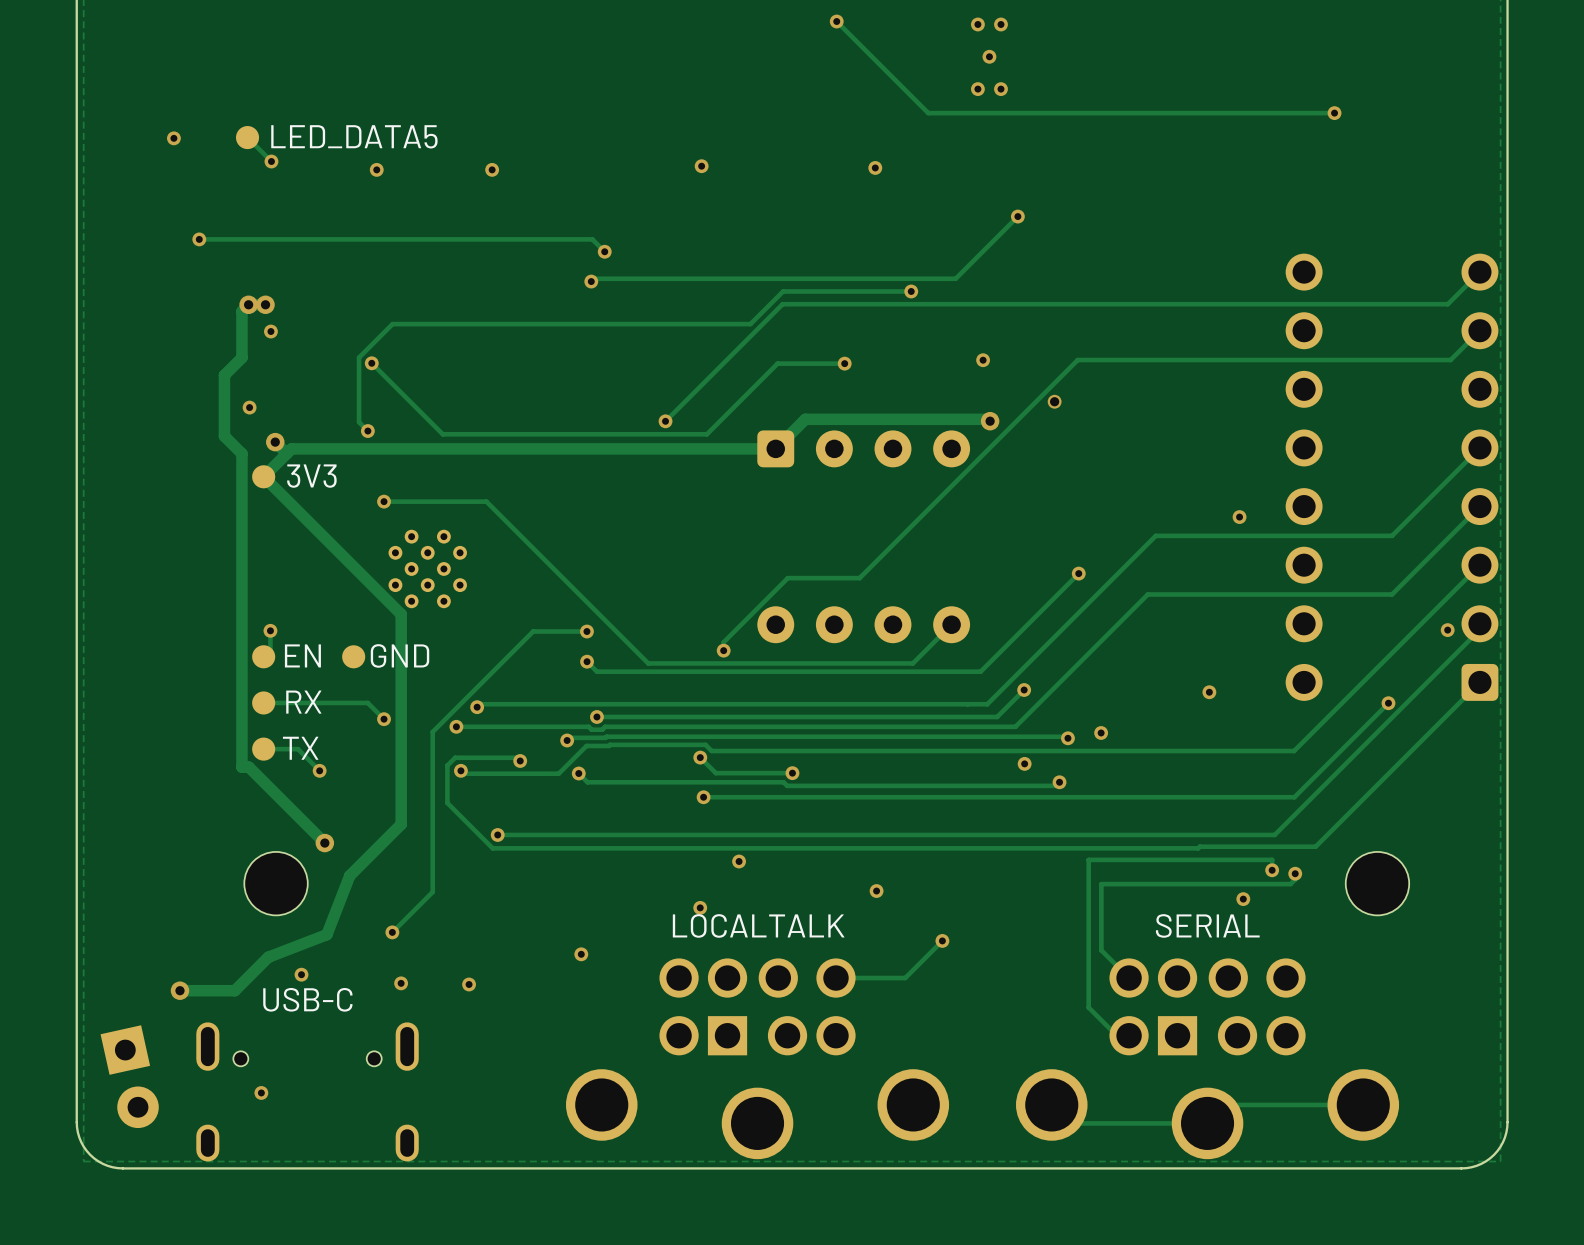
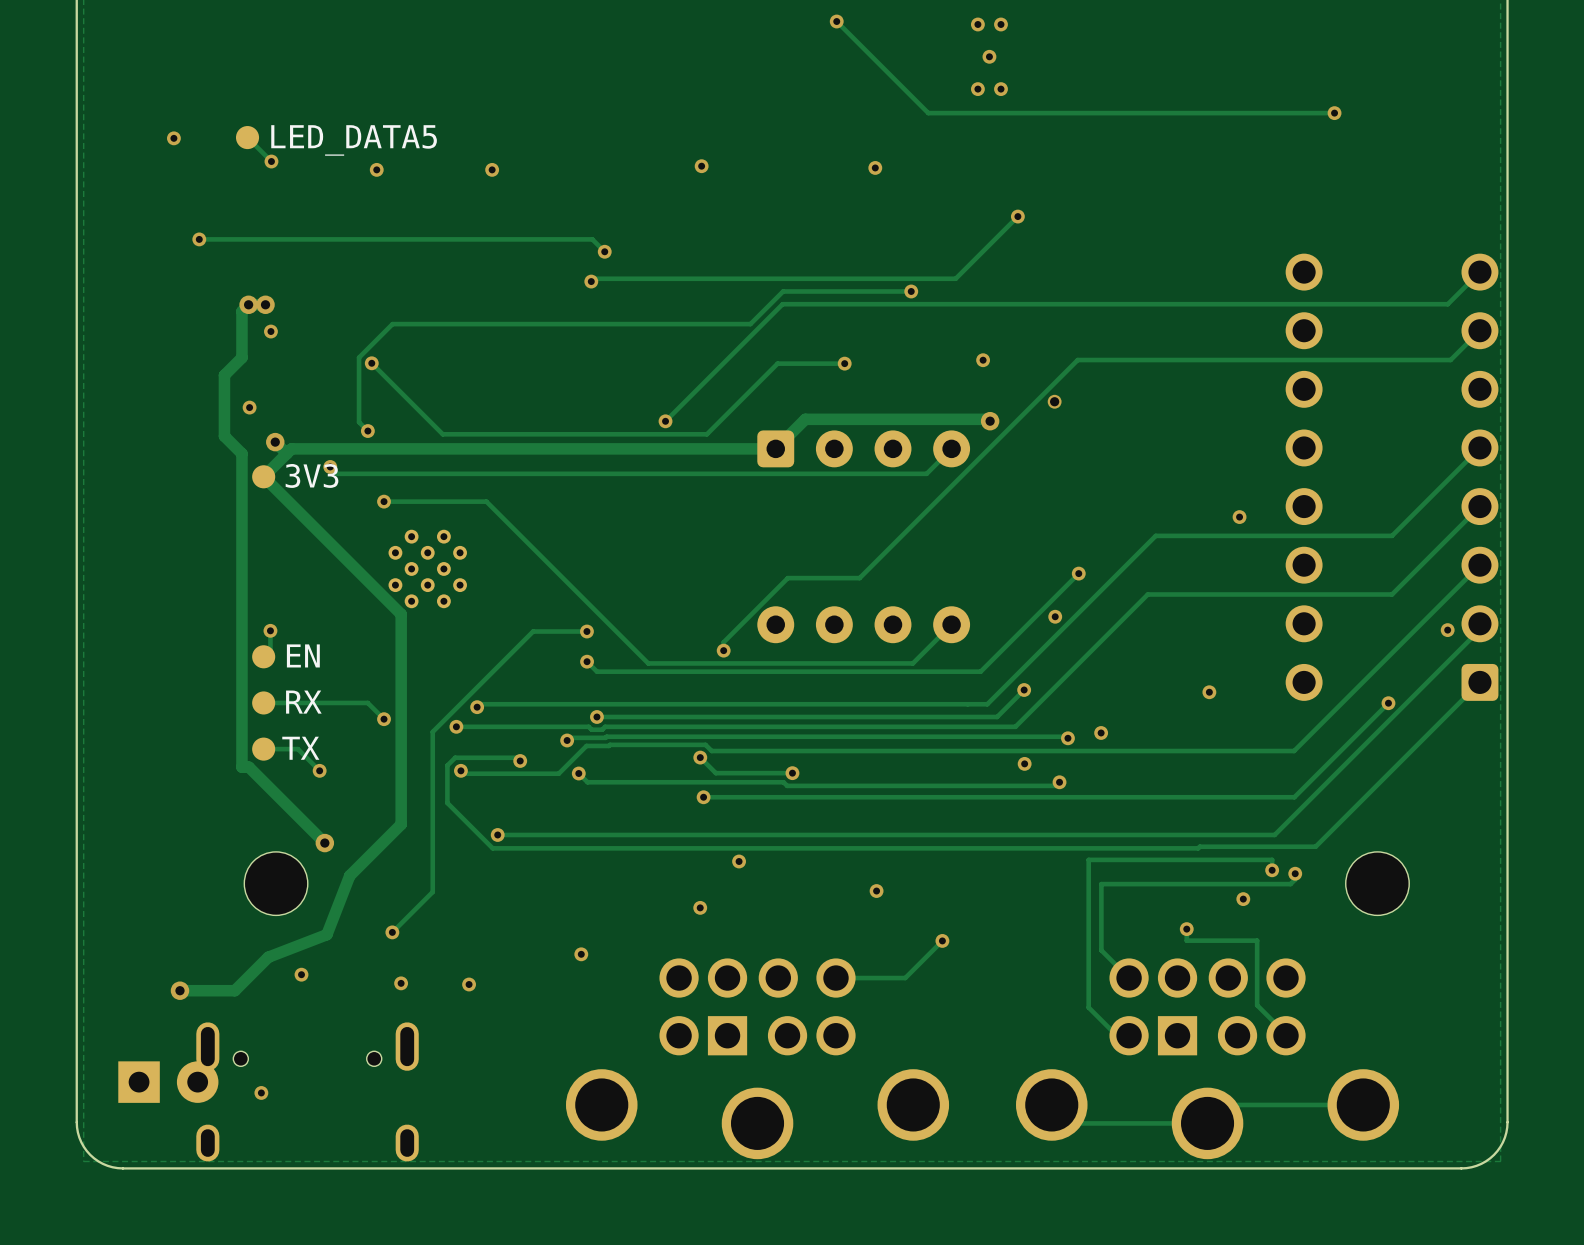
track: none -> (951, 448) (926, 473) (337, 473) (330, 466)
via: none -> (330, 466)
via: none -> (1055, 616)
part: (353, 656) -> none
text: LOCALTALK (758, 925) -> none
text: SERIAL (1207, 925) -> none
track: none -> (1186, 929) (1186, 940) (1257, 940) (1257, 1005) (1285, 1035)
via: none -> (1186, 929)
text: USB-C (307, 999) -> none
part: (129, 1076) -> none
part: none -> (168, 1082)

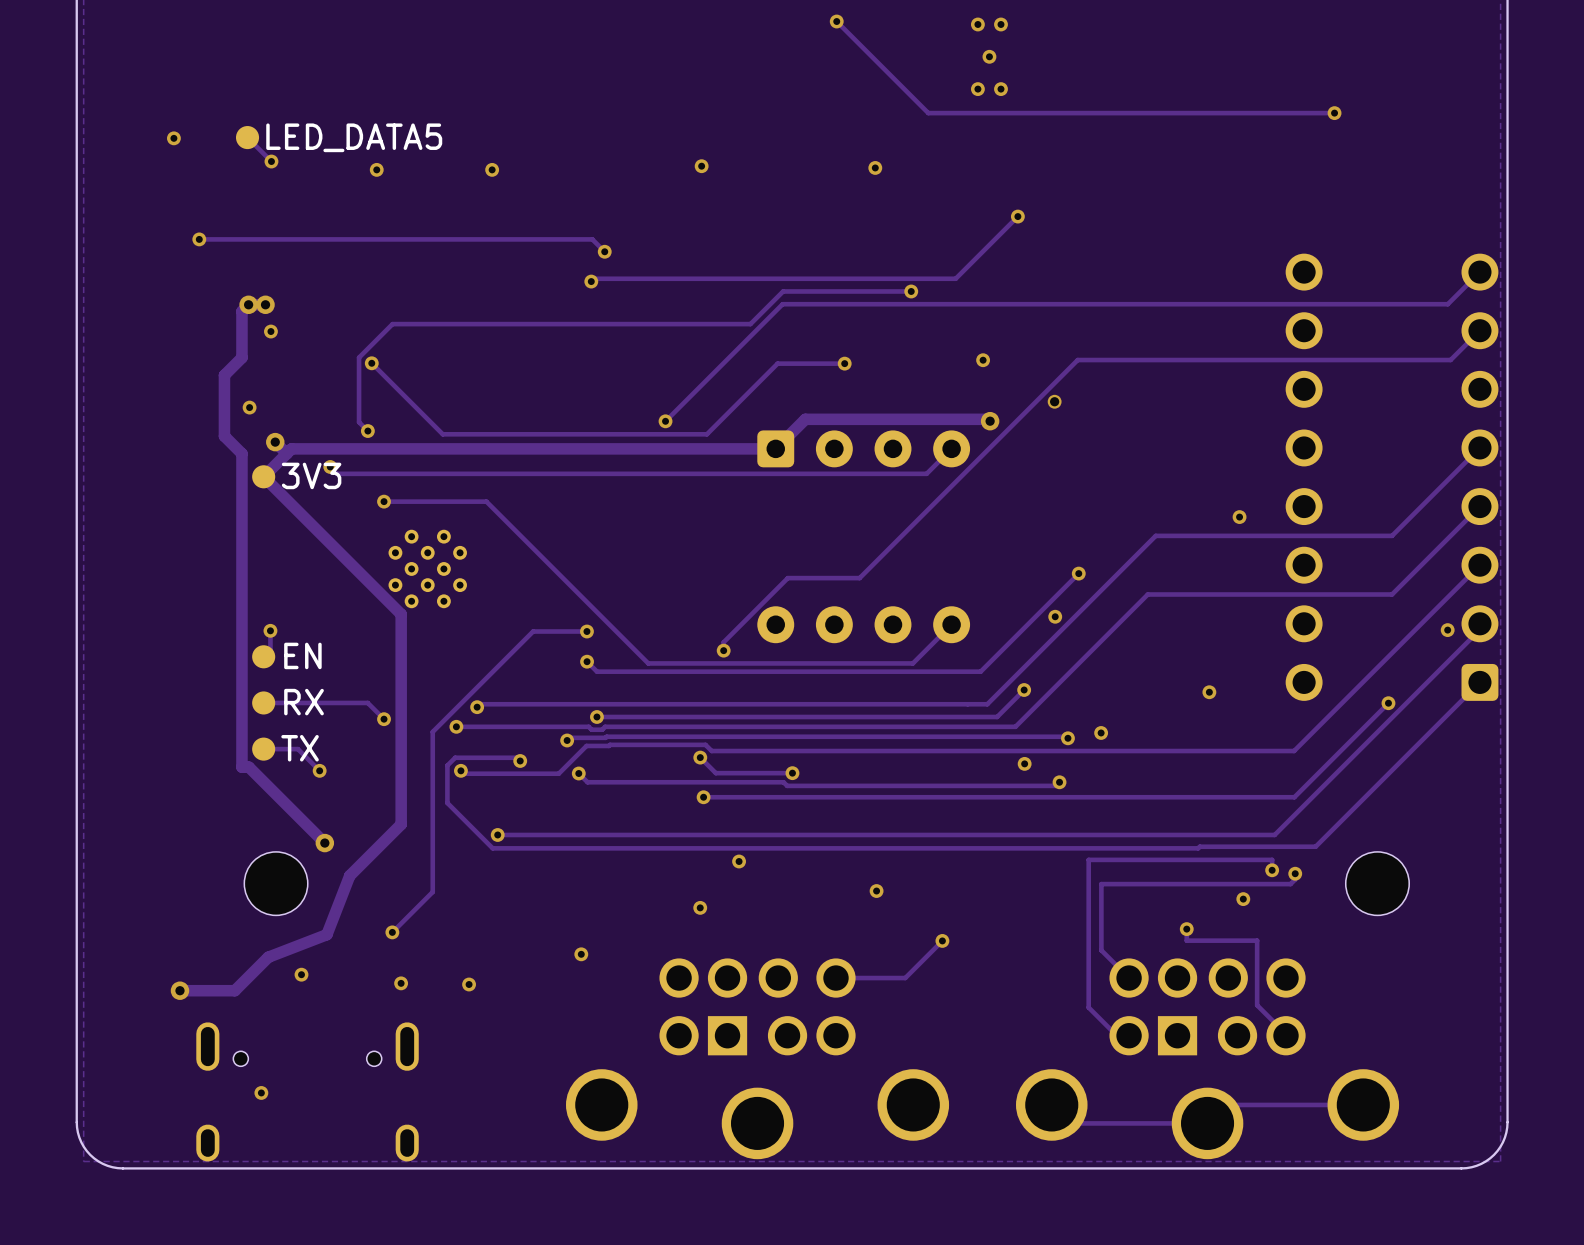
part: (168, 1082) -> none

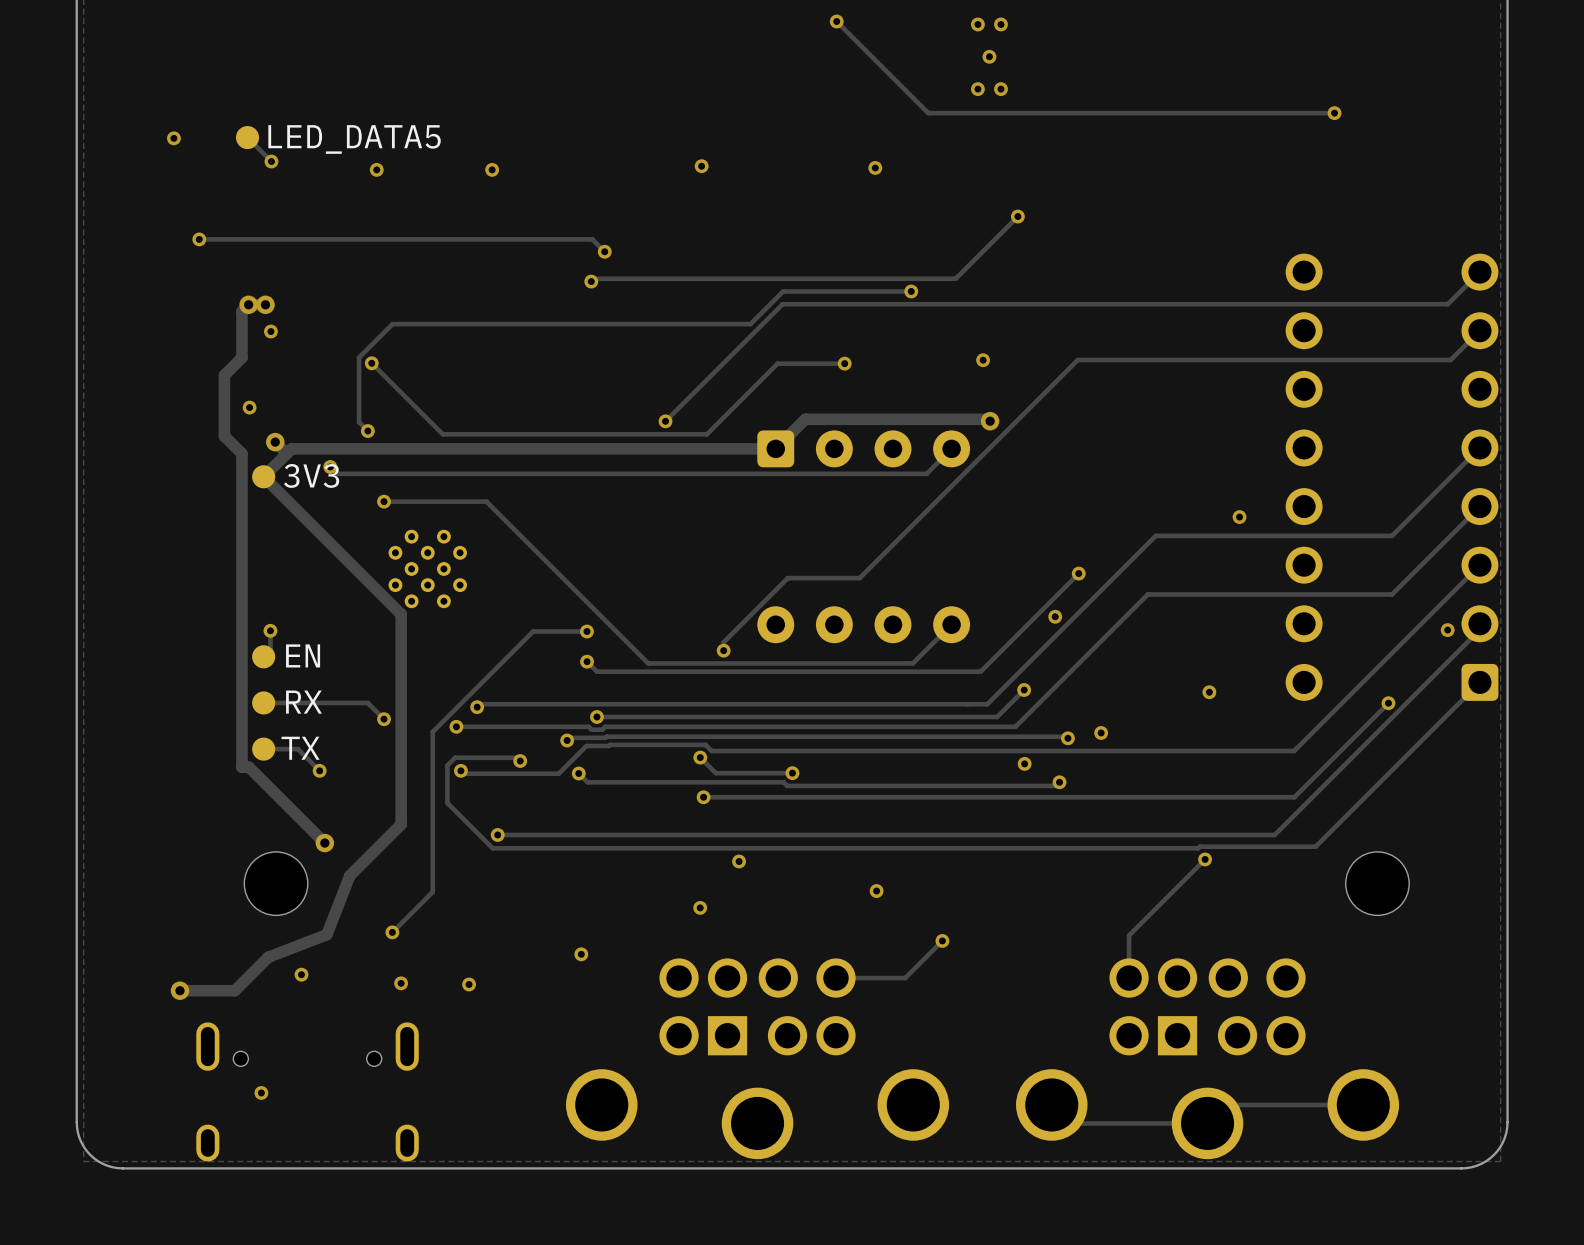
via: (1054, 401) -> none
via: none -> (1205, 859)
track: (1272, 870) (1272, 859) (1088, 859) (1088, 1007) (1116, 1035) (1129, 1035) -> none
via: (1272, 870) -> none
track: (1295, 873) (1295, 879) (1290, 884) (1101, 884) (1101, 950) (1129, 978) -> (1205, 859) (1129, 935) (1129, 978)
via: (1295, 873) -> none
via: (1243, 899) -> none
track: (1186, 929) (1186, 940) (1257, 940) (1257, 1005) (1285, 1035) -> none
via: (1186, 929) -> none

